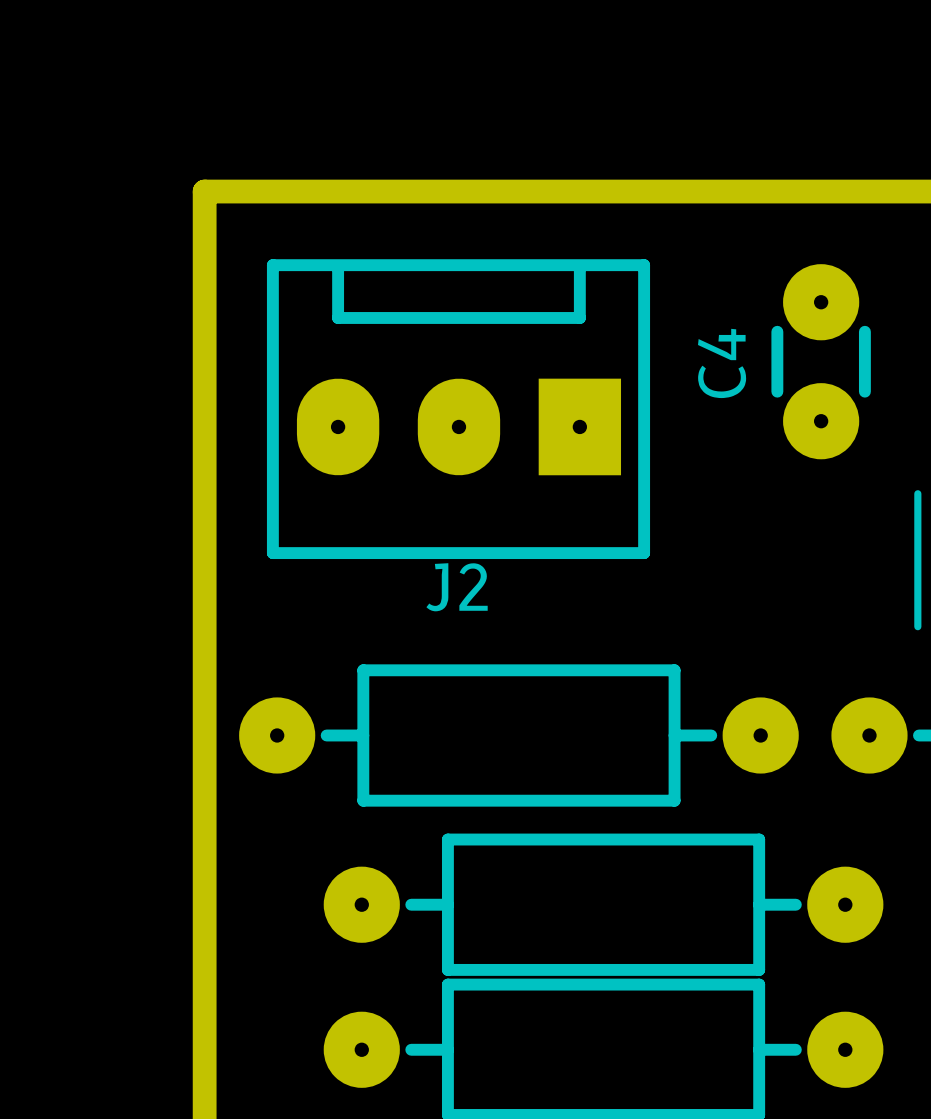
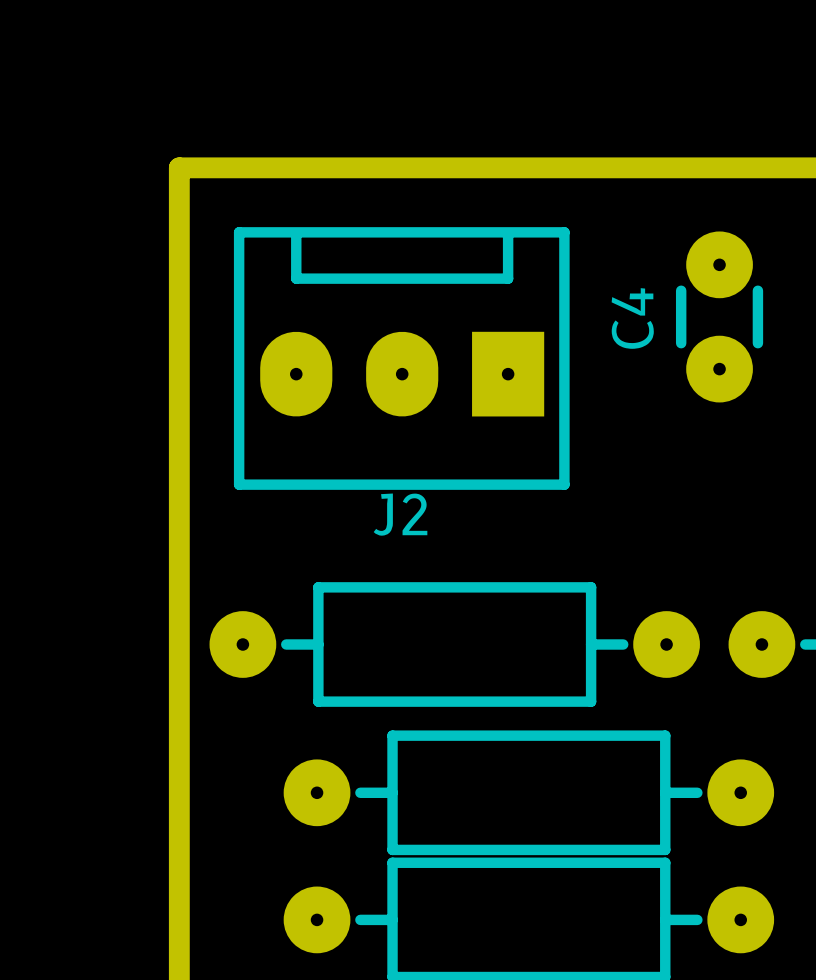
line: (917, 493) (917, 626) -> none

